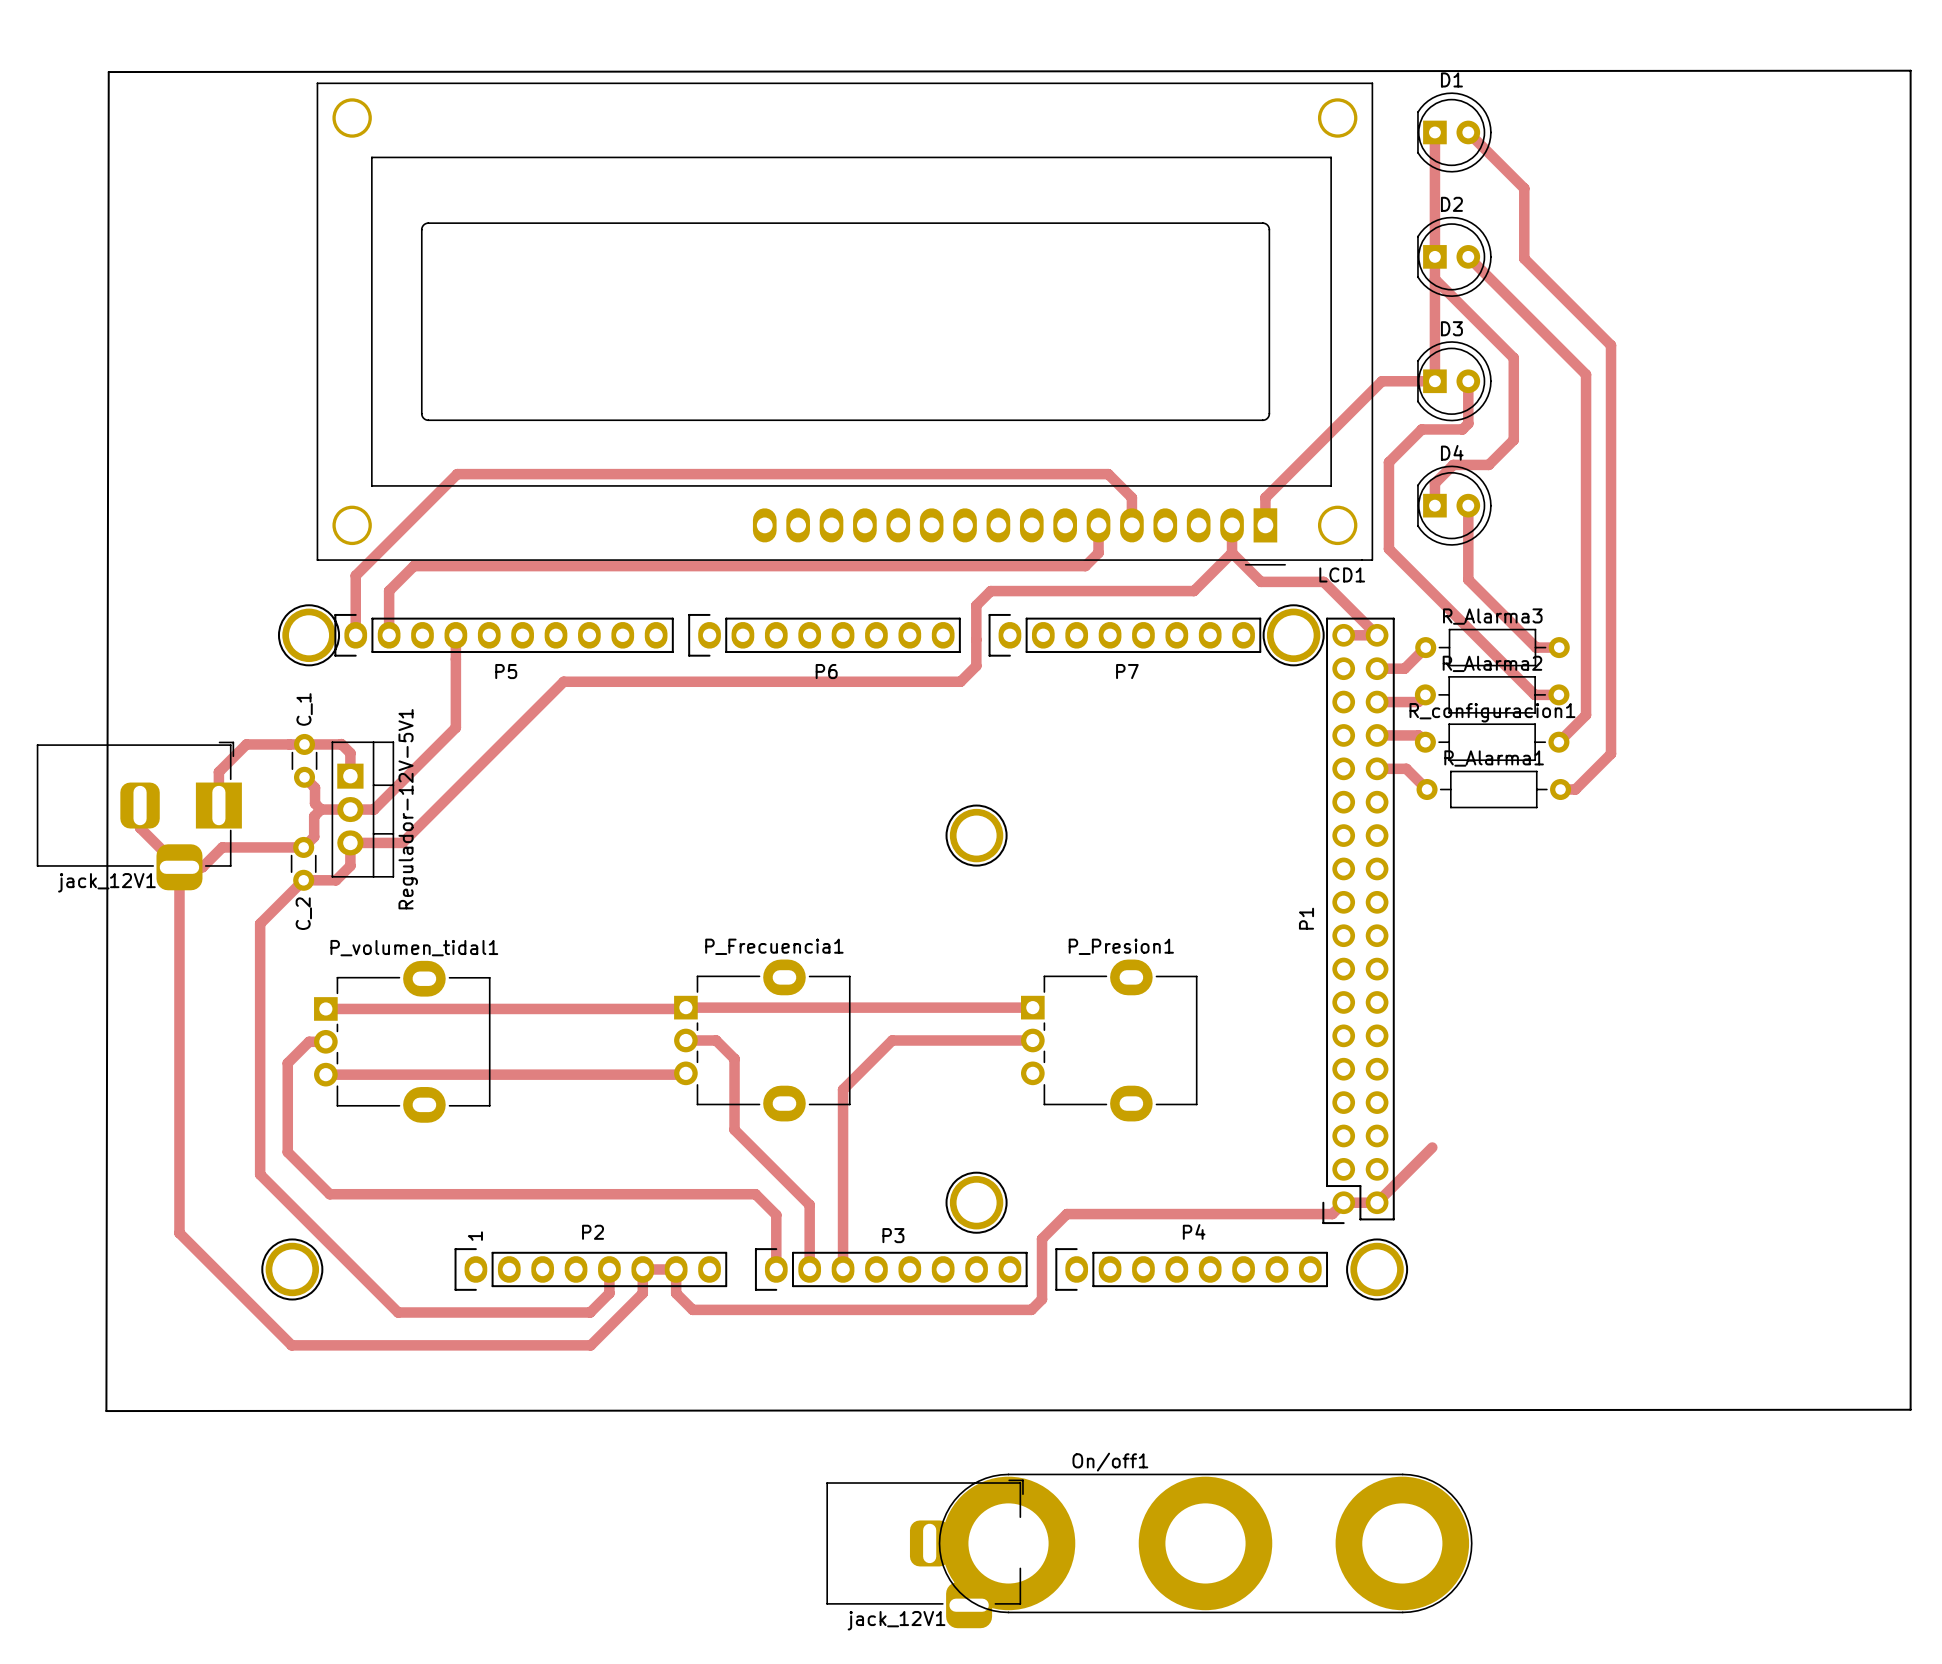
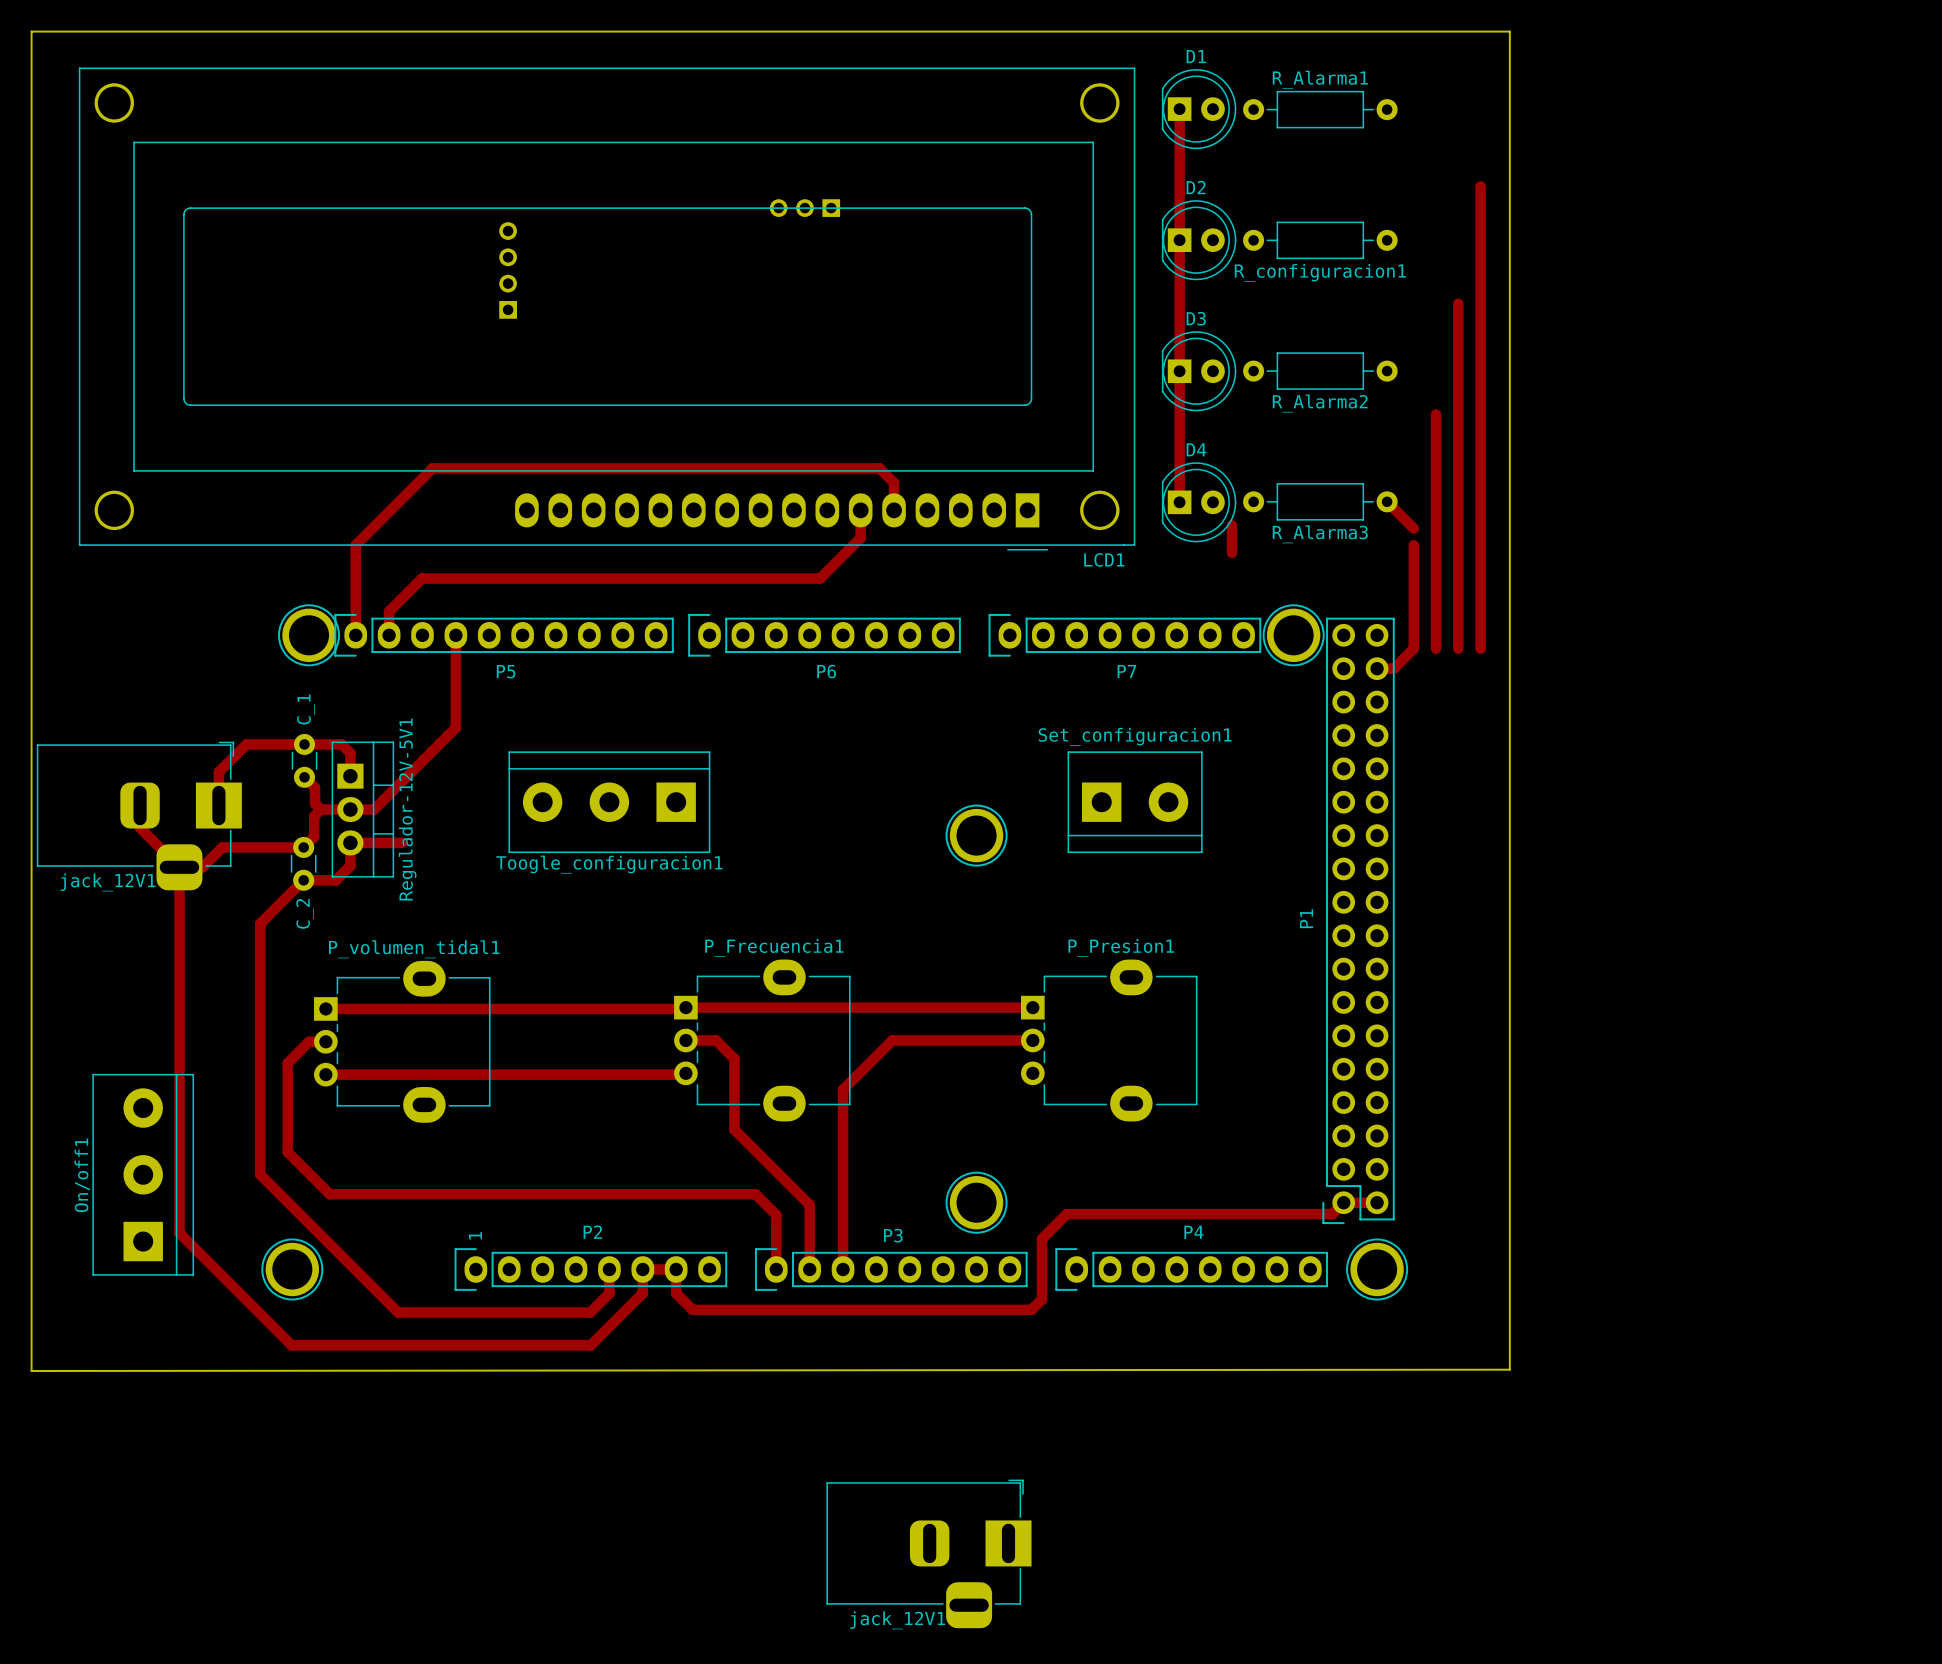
board edge: (1910, 70) (1910, 1409) (106, 1411) (108, 72) (1910, 70) -> (31, 31) (31, 1371) (1509, 1369) (1509, 31) (31, 31)
top track: none -> (1179, 109) (1179, 502)
top track: (1434, 132) (1434, 381) (1381, 381) (1265, 497) (1265, 525) -> none
D1 position: (1454, 132) -> (1199, 109)
top track: (1468, 132) (1524, 188) (1524, 258) (1611, 345) (1611, 753) (1575, 789) (1560, 789) -> none
top track: none -> (1480, 186) (1480, 648)
part: none -> (804, 208)
D2 position: (1454, 256) -> (1199, 240)
top track: (1468, 256) (1586, 374) (1586, 715) (1558, 742) -> none
part: none -> (508, 270)
top track: (1434, 279) (1513, 358) (1513, 439) (1488, 464) (1453, 464) (1434, 483) (1434, 505) -> none
top track: none -> (1458, 303) (1458, 648)
LCD1 position: (844, 324) -> (607, 309)
D3 position: (1454, 381) -> (1199, 371)
top track: (1468, 381) (1468, 423) (1462, 429) (1421, 429) (1388, 462) (1388, 549) (1534, 694) (1558, 694) -> none
top track: none -> (1436, 414) (1436, 648)
top track: none -> (1387, 501) (1413, 528)
D4 position: (1454, 505) -> (1199, 502)
top track: (1468, 505) (1468, 579) (1536, 647) (1559, 647) -> none
top track: (1098, 525) (1098, 552) (1085, 566) (413, 566) (389, 590) (389, 611) -> (860, 510) (860, 537) (820, 578) (421, 578) (389, 611)
top track: (1131, 525) (1131, 497) (1108, 474) (457, 474) (355, 575) -> (894, 510) (894, 482) (879, 468) (432, 468) (355, 545) (355, 575)
R_Alarma3 name position: R_Alarma3 (1492, 616) -> R_Alarma3 (1320, 534)
top track: (1343, 635) (1377, 635) (1323, 581) (1260, 581) (1232, 552) (1193, 591) (990, 591) (976, 605) (976, 665) (960, 681) (563, 681) (402, 842) -> none
top track: (1425, 647) (1404, 668) (1393, 668) -> (1413, 545) (1413, 648) (1393, 668)
R_Alarma3 position: (1492, 647) -> (1320, 501)
R_Alarma2 name position: R_Alarma2 (1492, 663) -> R_Alarma2 (1320, 403)
top track: (1425, 694) (1418, 702) (1377, 702) -> none
R_Alarma2 position: (1492, 694) -> (1320, 371)
R_configuracion1 name position: R_configuracion1 (1492, 712) -> R_configuracion1 (1320, 272)
top track: (1377, 735) (1418, 735) (1425, 742) -> none
R_configuracion1 position: (1492, 742) -> (1320, 240)
top track: (1377, 768) (1406, 768) (1427, 789) -> none
R_Alarma1 position: (1493, 789) -> (1320, 109)
Toogle_configuracion1: none -> (609, 802)
Set_configuracion1: none -> (1135, 802)
top track: (1432, 1147) (1377, 1202) -> none
On/off1 name position: On/off1 (1110, 1462) -> On/off1 (82, 1175)
On/off1 footprint: [938, 1473, 1473, 1614] -> [92, 1073, 195, 1276]

